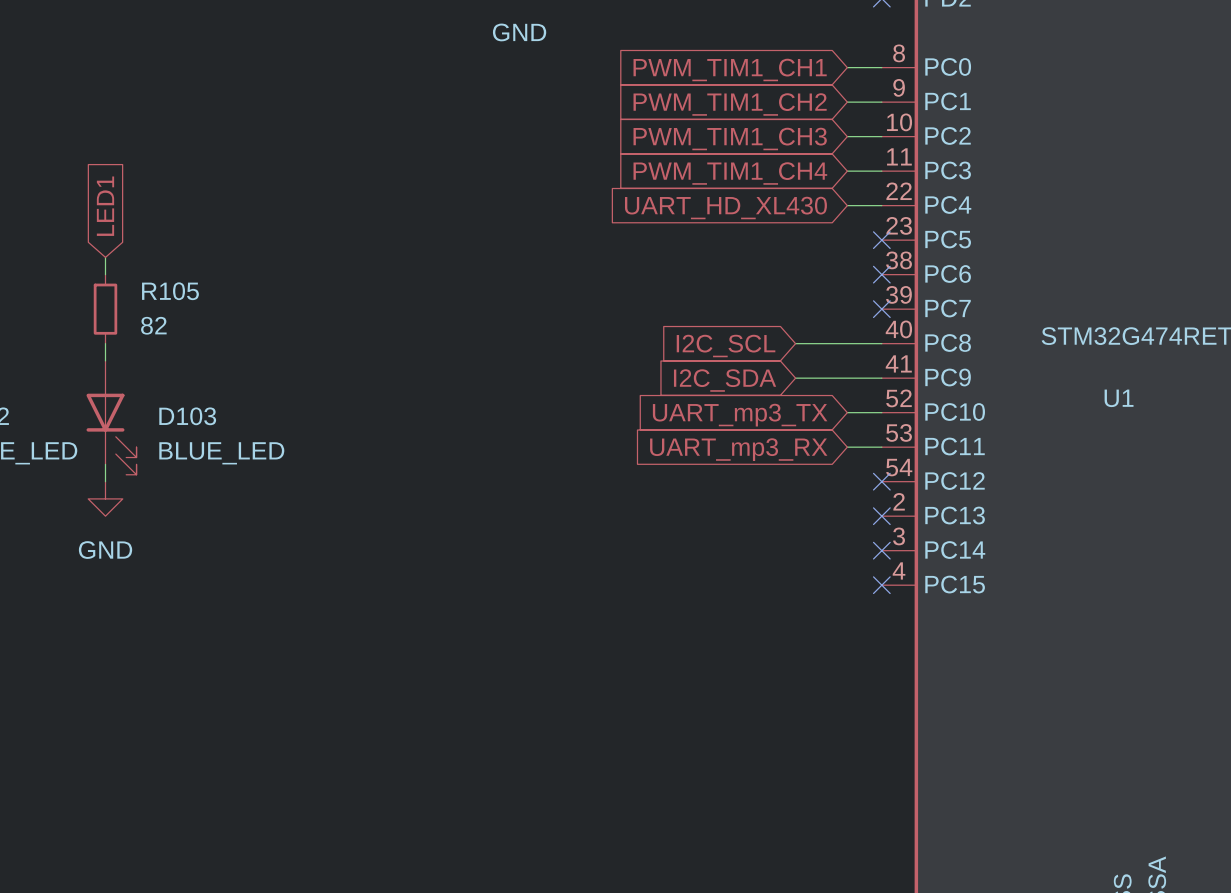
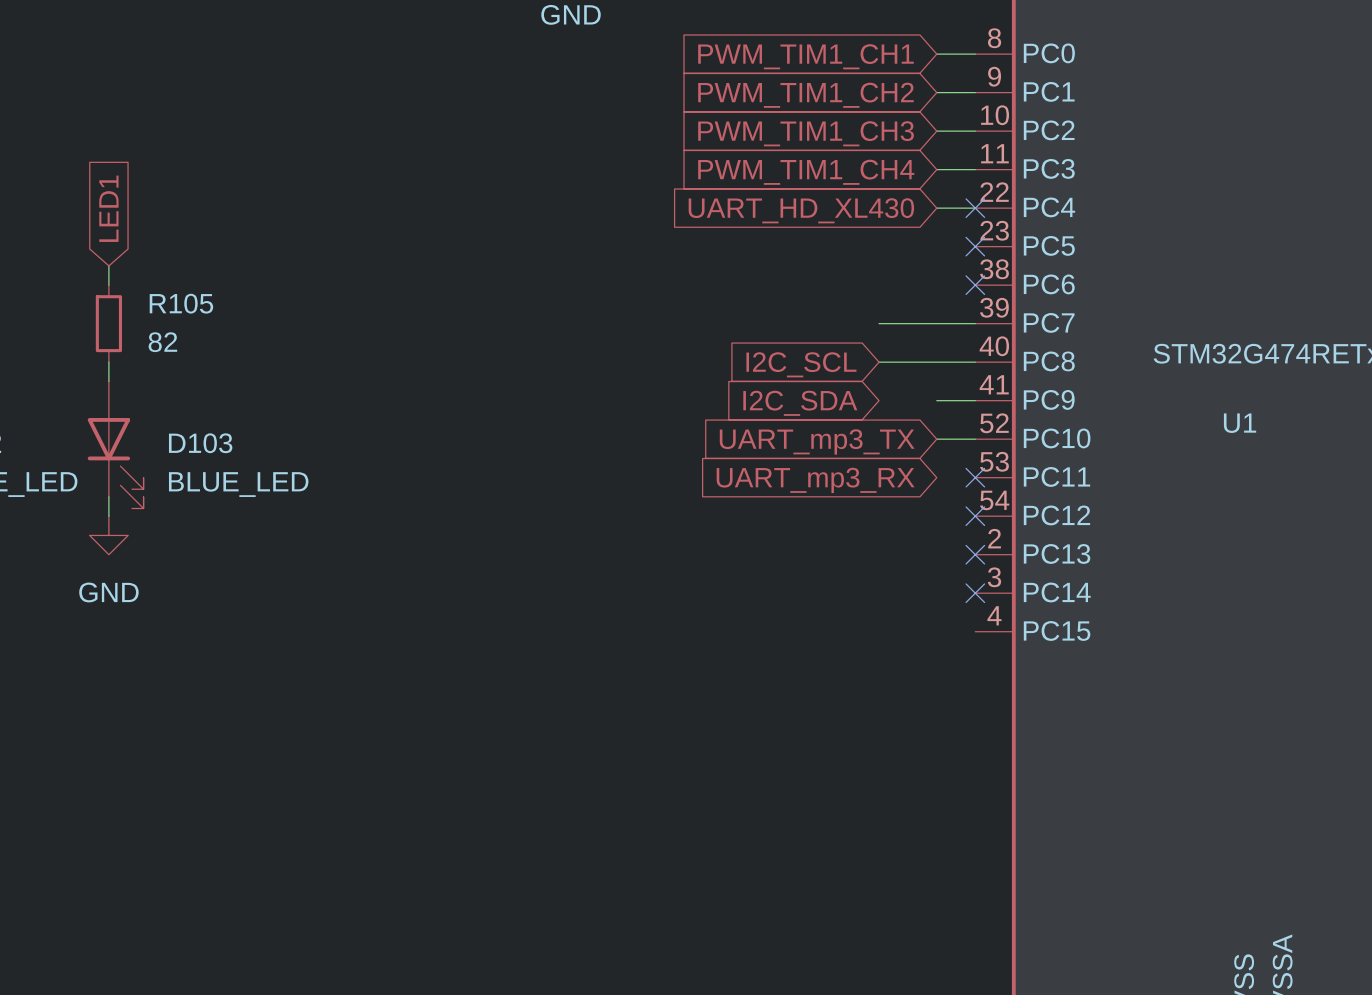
no-connect mark: none -> (975, 208)
wire: none -> (879, 323) (975, 323)
no-connect mark: (881, 309) -> none
wire: (795, 378) (847, 378) -> none
wire: (847, 447) (881, 447) -> none
no-connect mark: none -> (975, 477)
no-connect mark: (881, 585) -> none

